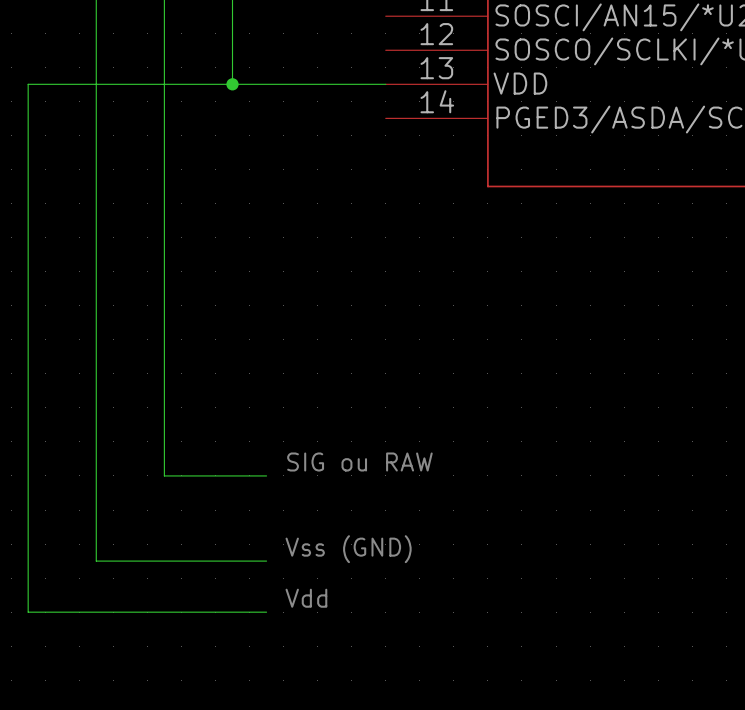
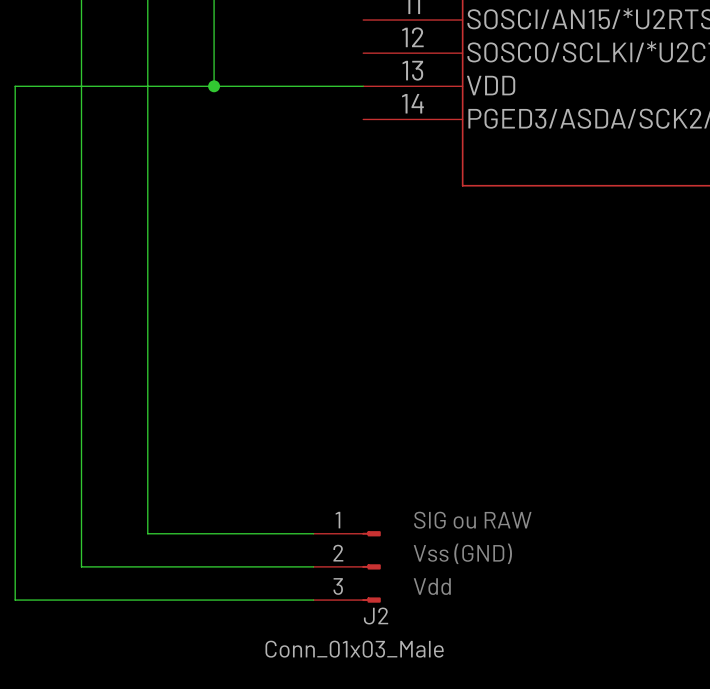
text position: SIG ou RAW (359, 462) -> SIG ou RAW (472, 520)
wire: (164, 475) (266, 475) -> (147, 467) (147, 533) (313, 533)
text position: Vss (GND) (348, 549) -> Vss (GND) (462, 553)
wire: (96, 561) (266, 561) -> (81, 550) (81, 566) (313, 566)
J2: none -> Conn_01x03_Male (347, 566)
text position: Vdd (306, 598) -> Vdd (432, 586)
wire: none -> (247, 600) (313, 600)

